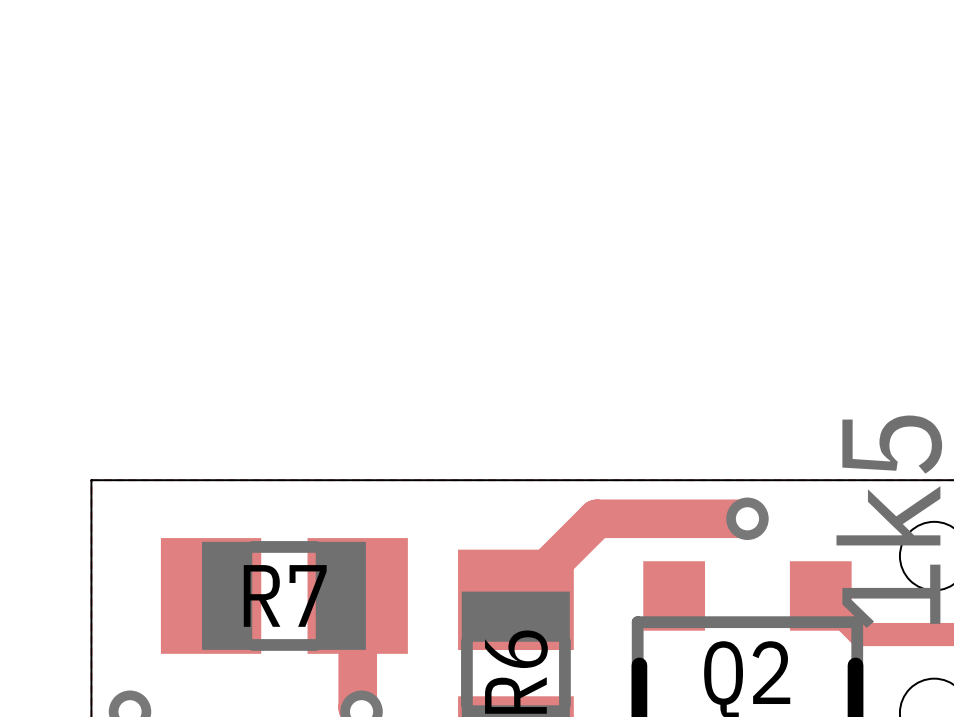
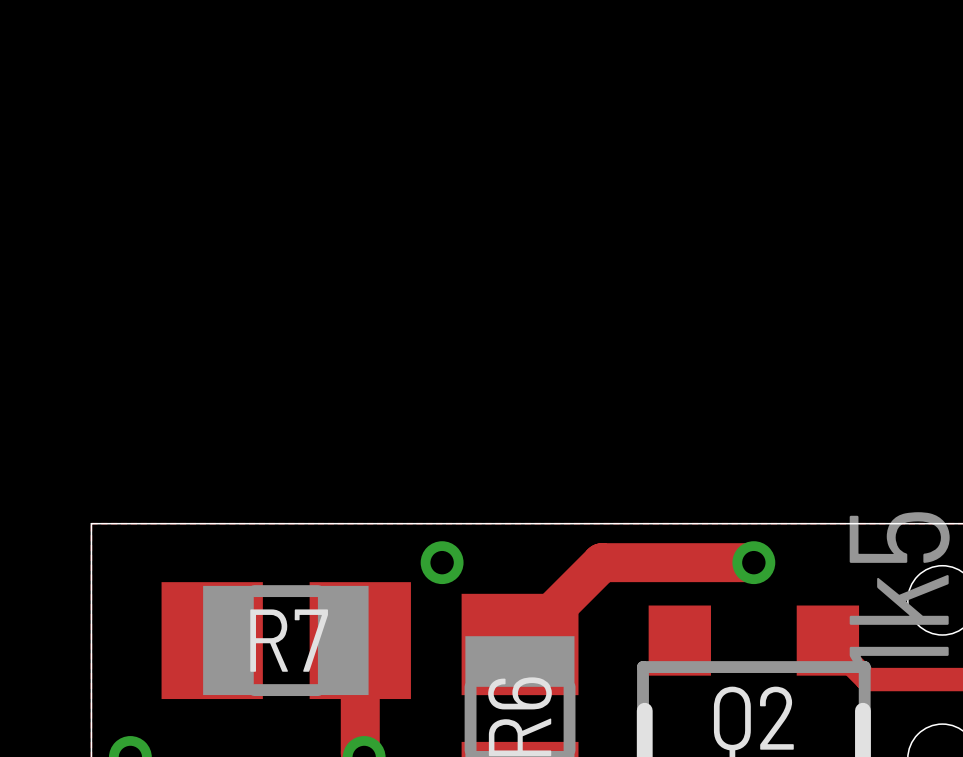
via: none -> (442, 562)

